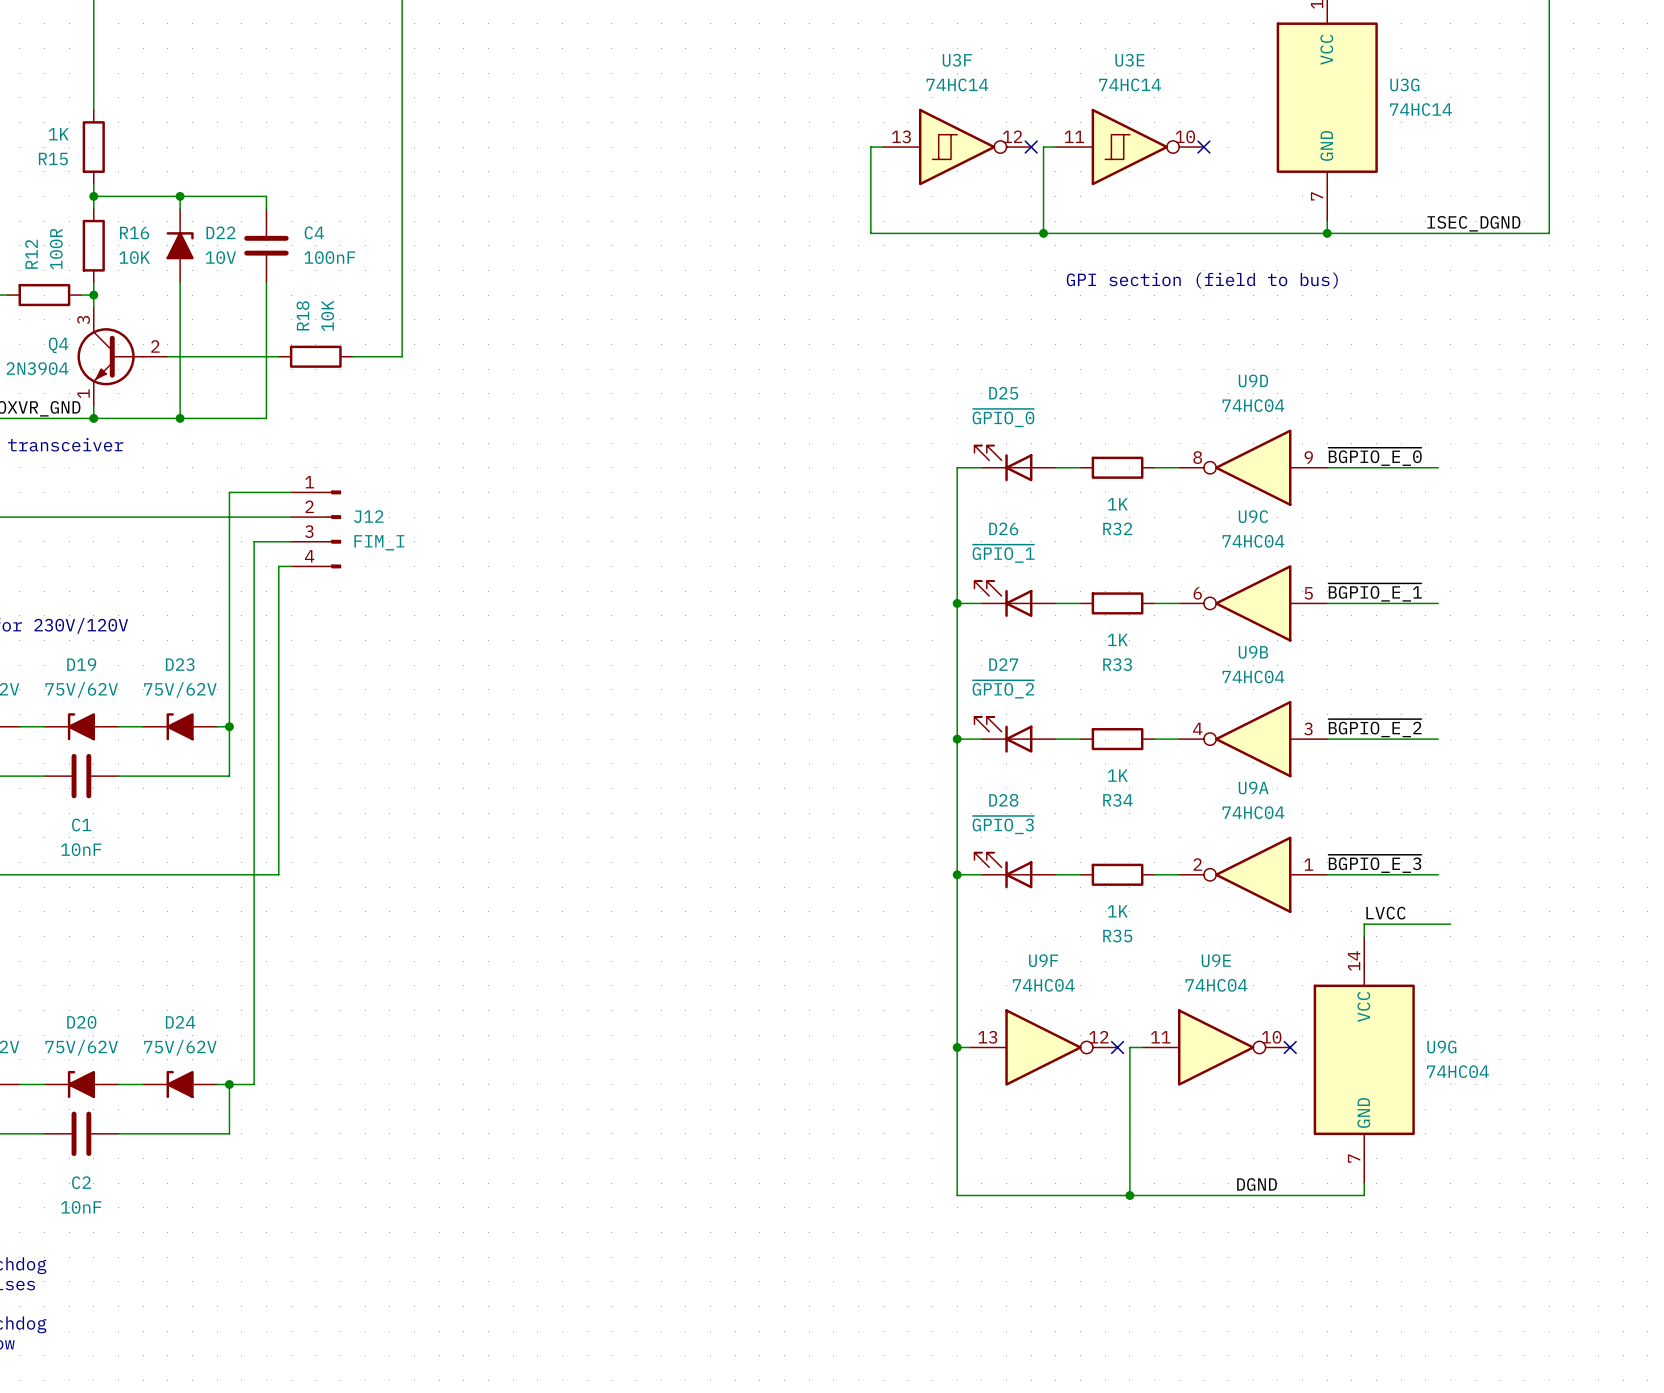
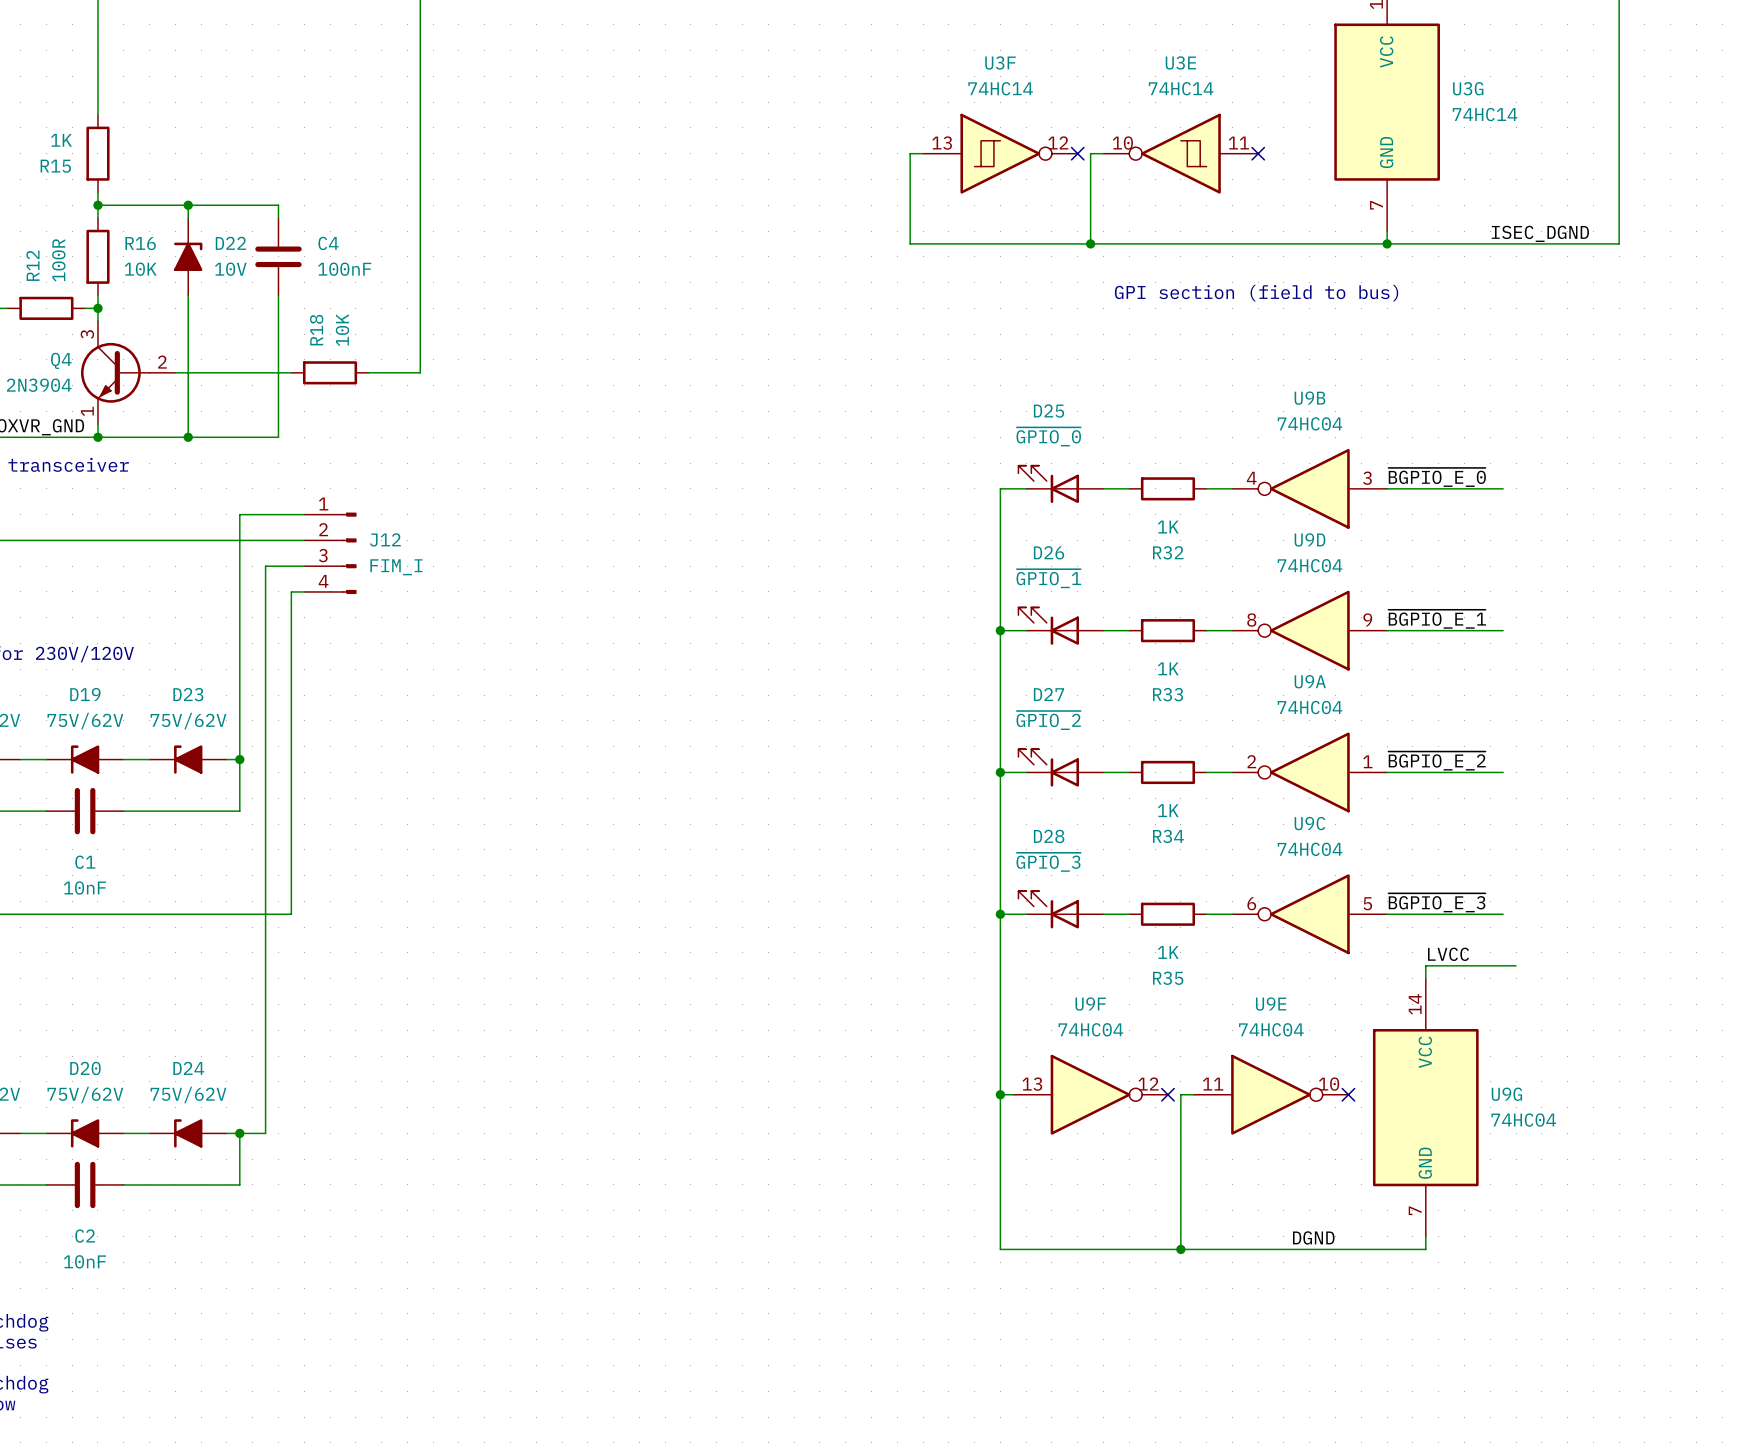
U3E flip: as is (1129, 147) -> left-right (1180, 153)
U9D position: (1253, 467) -> (1309, 630)
U9C position: (1253, 603) -> (1309, 914)
U9B position: (1253, 739) -> (1309, 488)
U9A position: (1253, 874) -> (1309, 772)

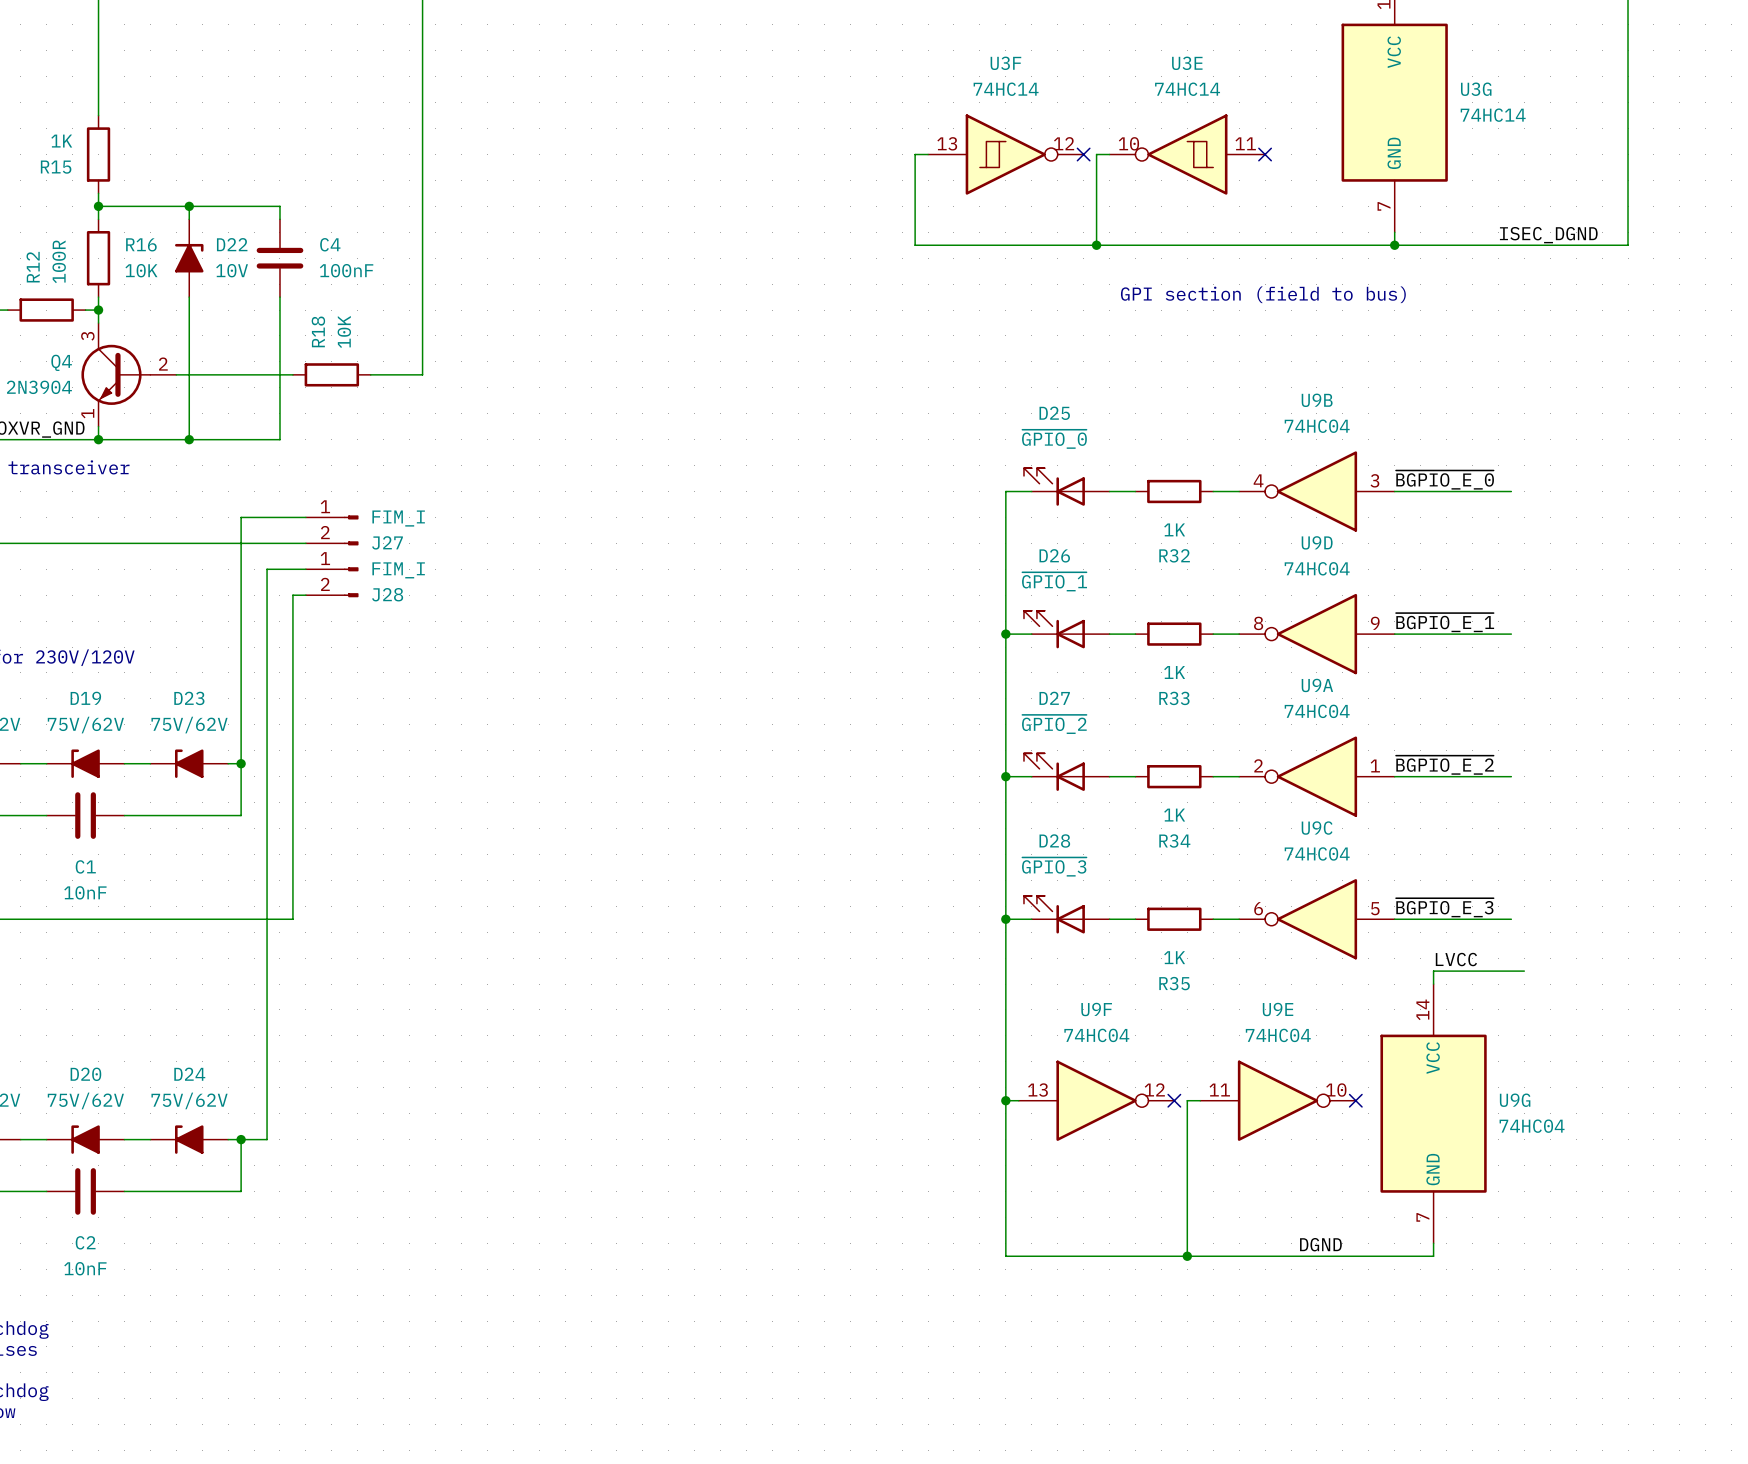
J27: none -> FIM_I (332, 530)
J12: FIM_I (330, 553) -> none
J28: none -> FIM_I (332, 582)

